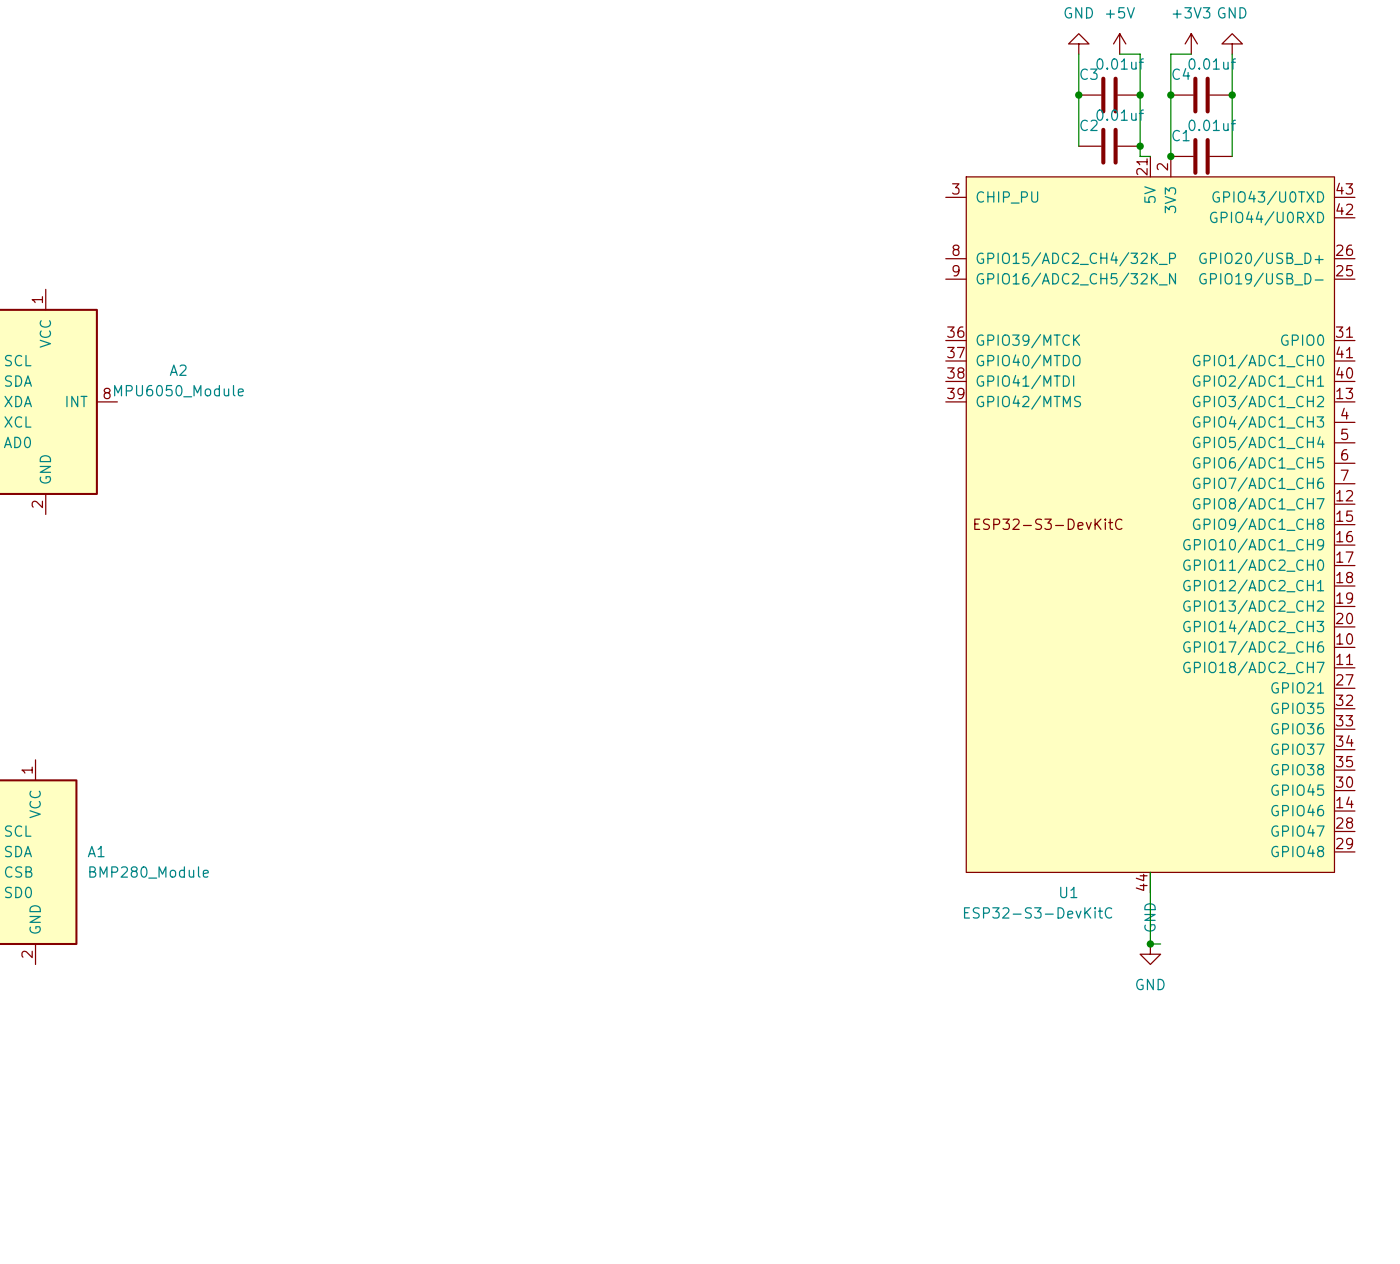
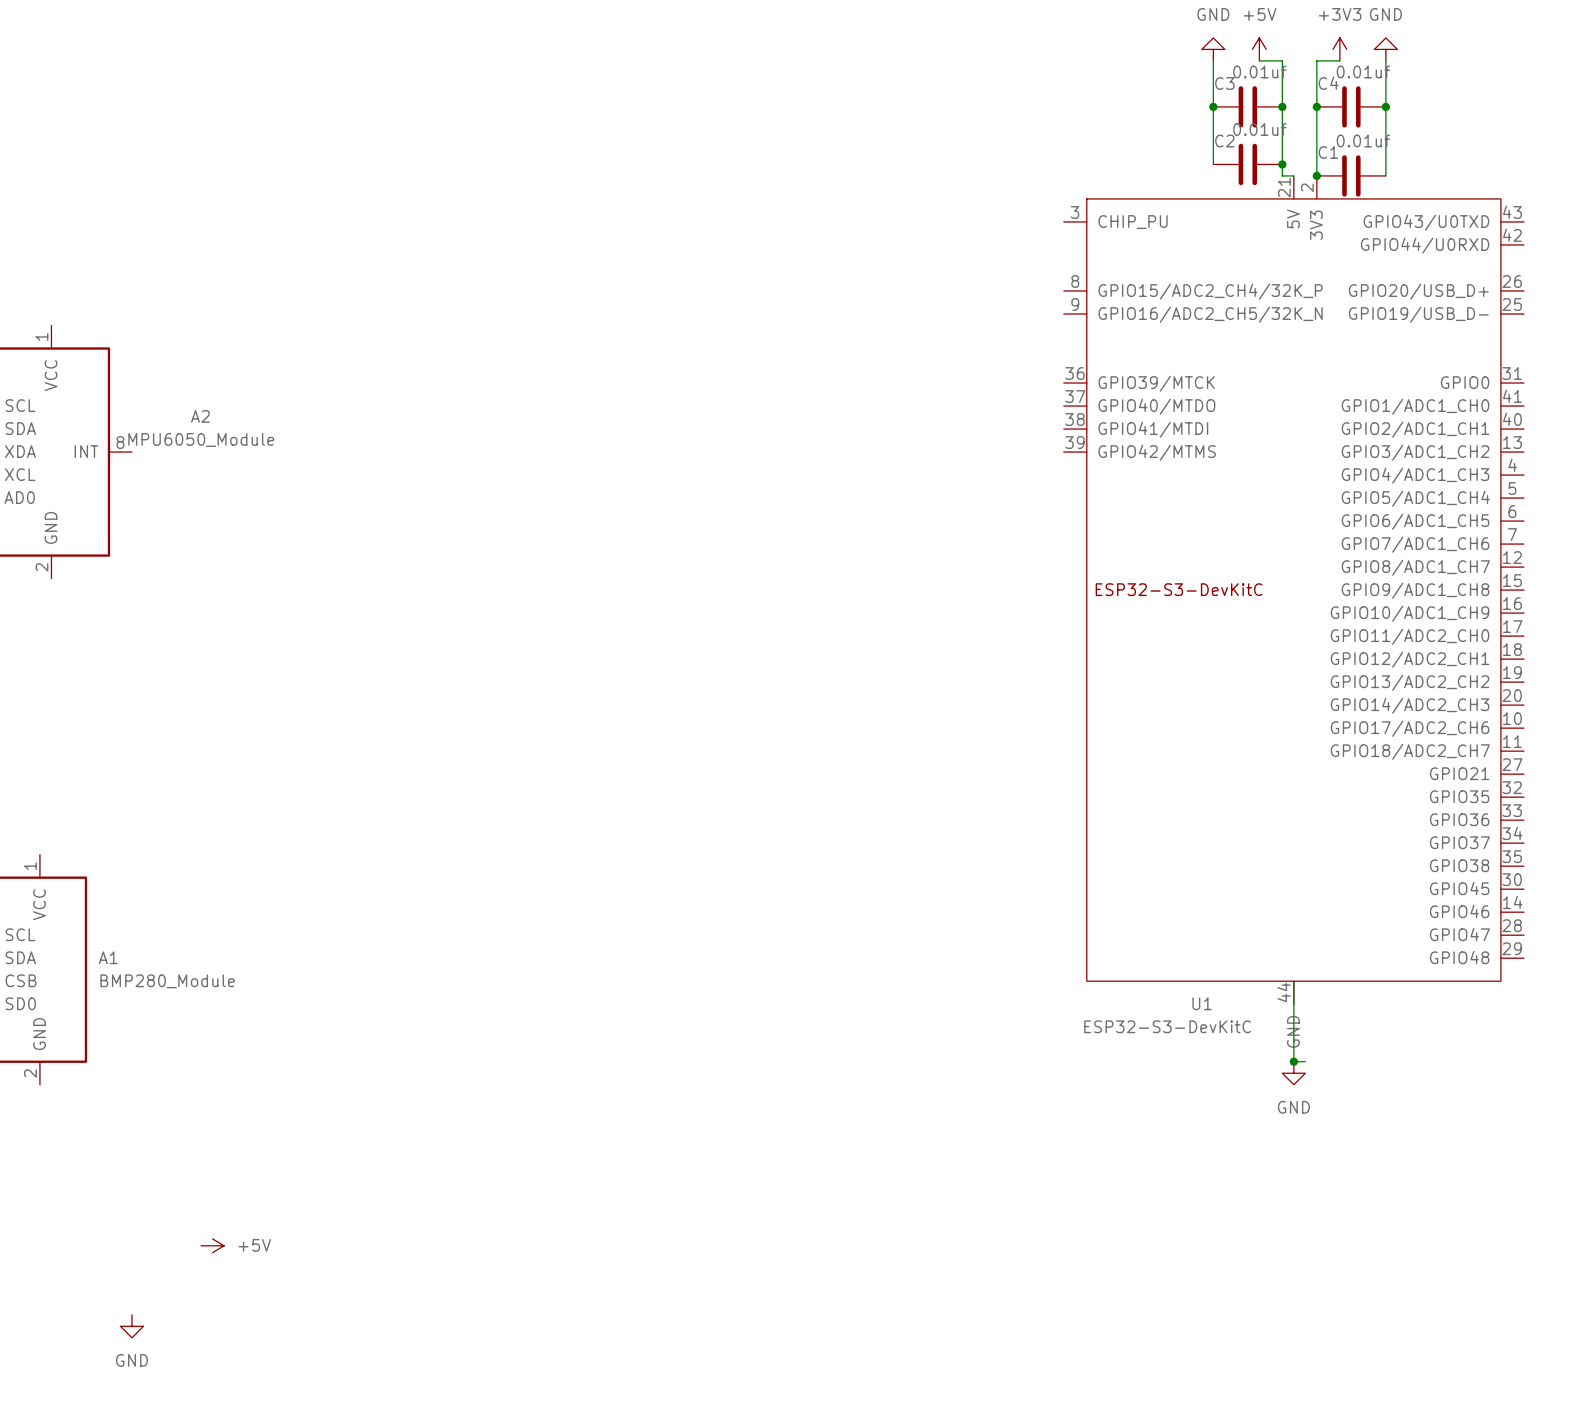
power symbol: none -> +5V (212, 1245)
power symbol: none -> GND (131, 1326)

